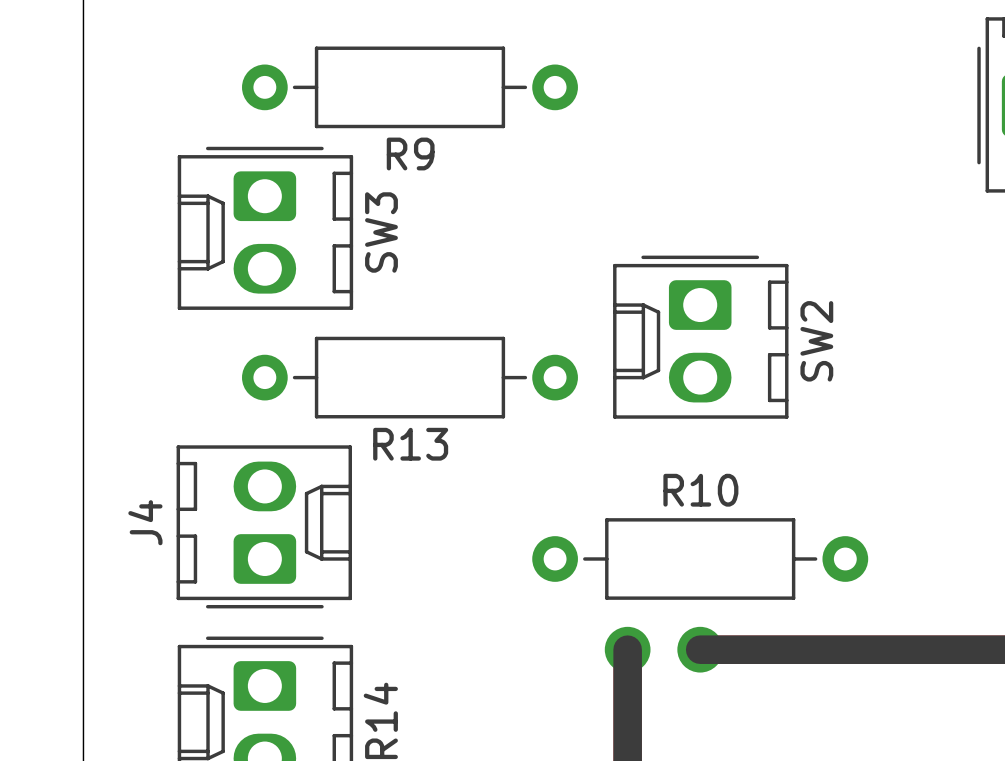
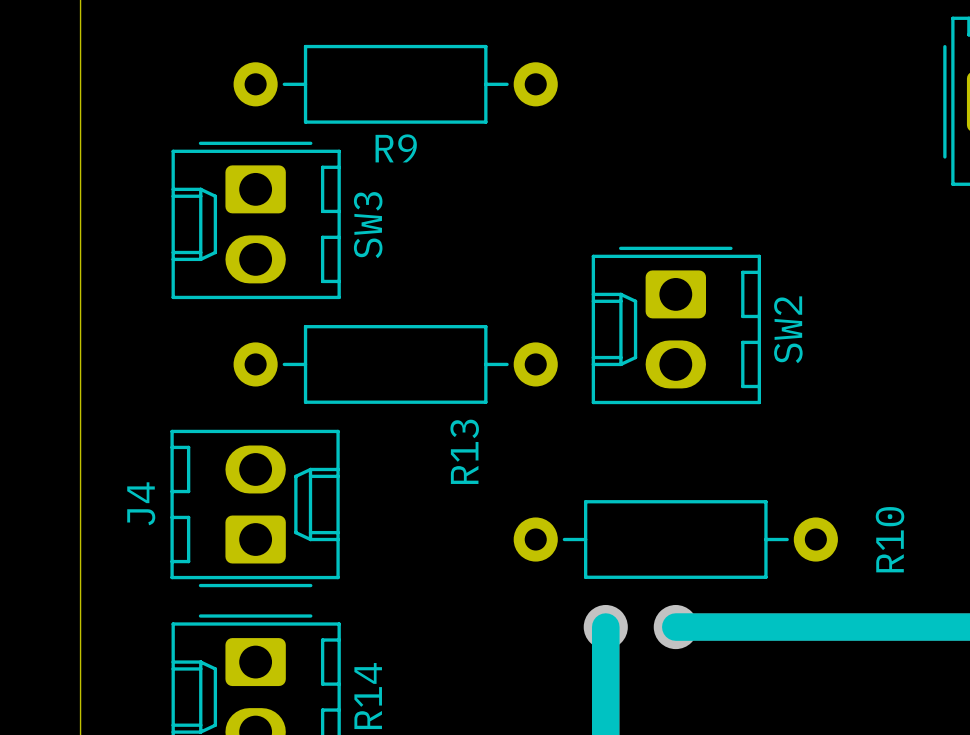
R13 name rotation: 0° (410, 444) -> 90° counterclockwise (464, 451)
R10 name rotation: 0° (700, 490) -> 90° counterclockwise (890, 539)
R10 name position: R10 (700, 490) -> R10 (890, 539)

